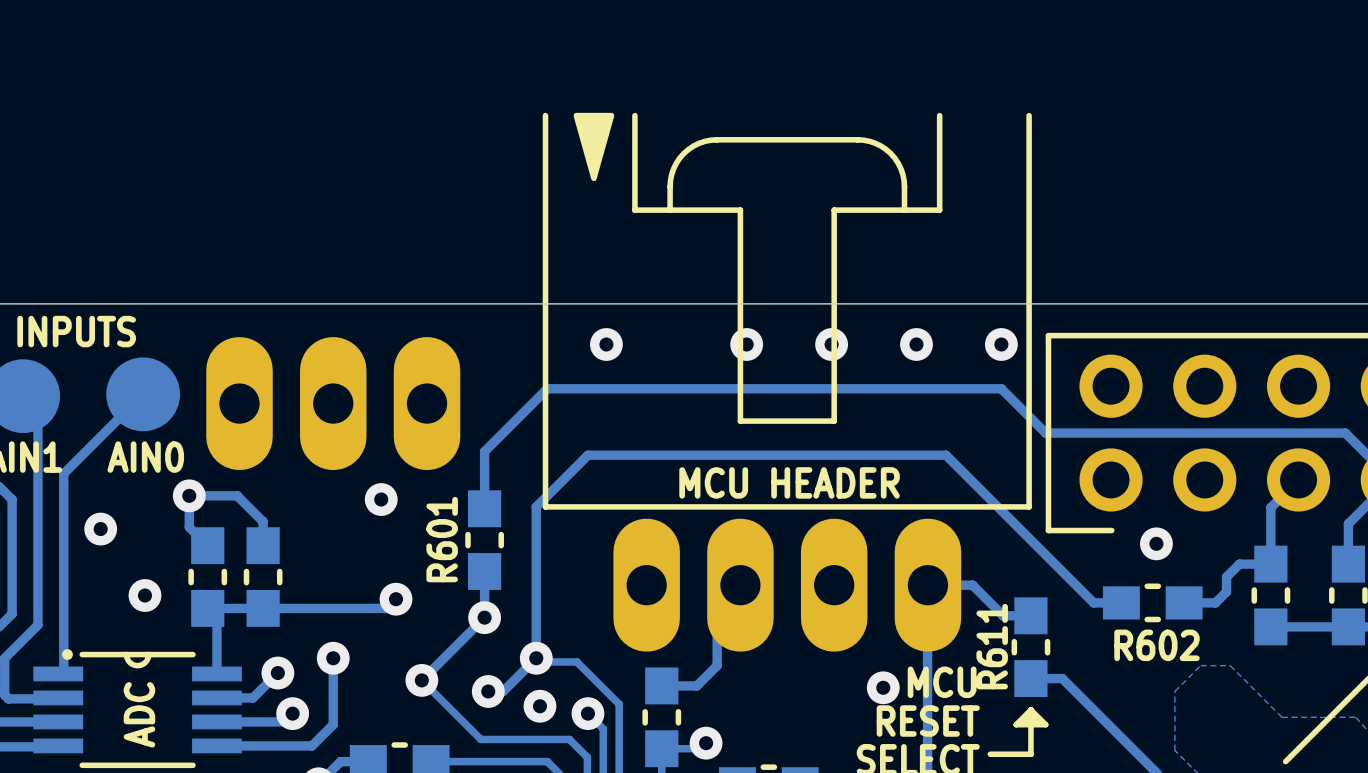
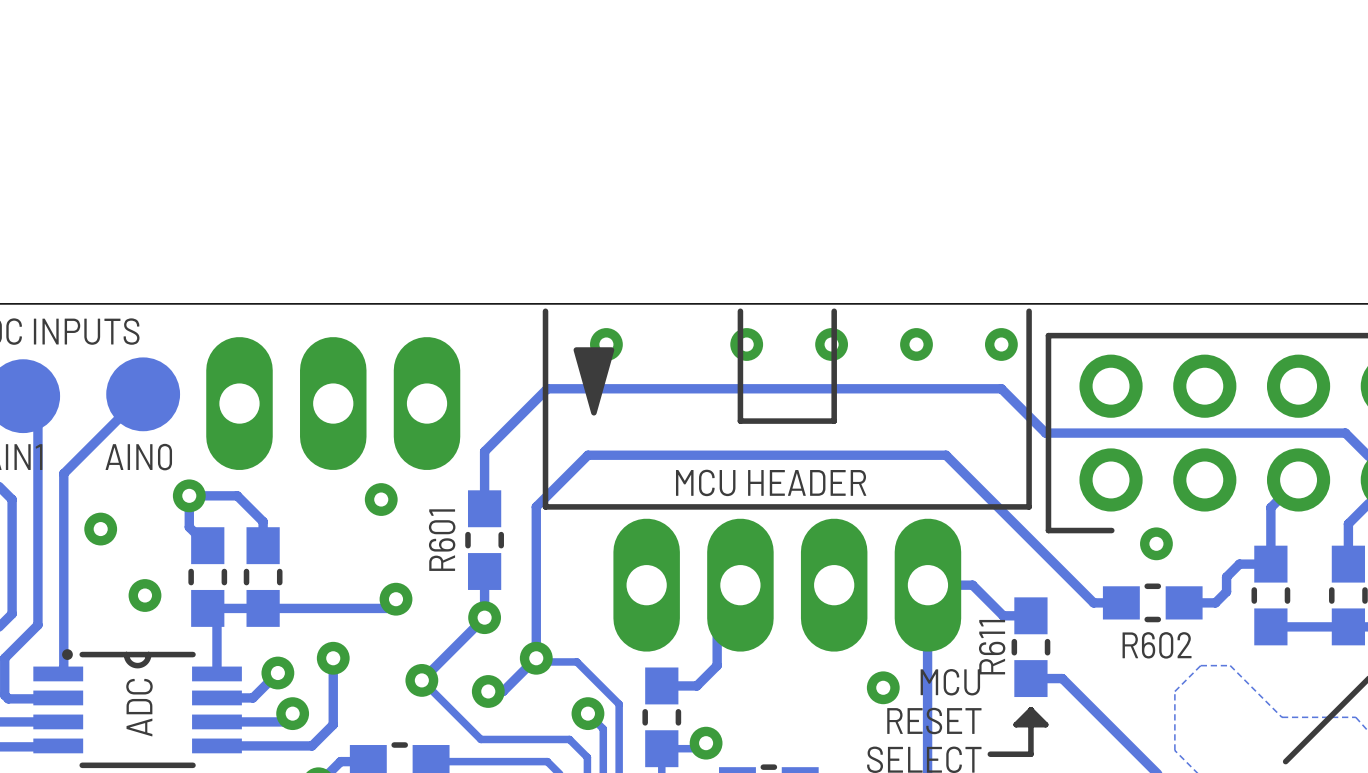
part: (787, 382) -> none
part: none -> (787, 480)
via: (539, 706) -> none

